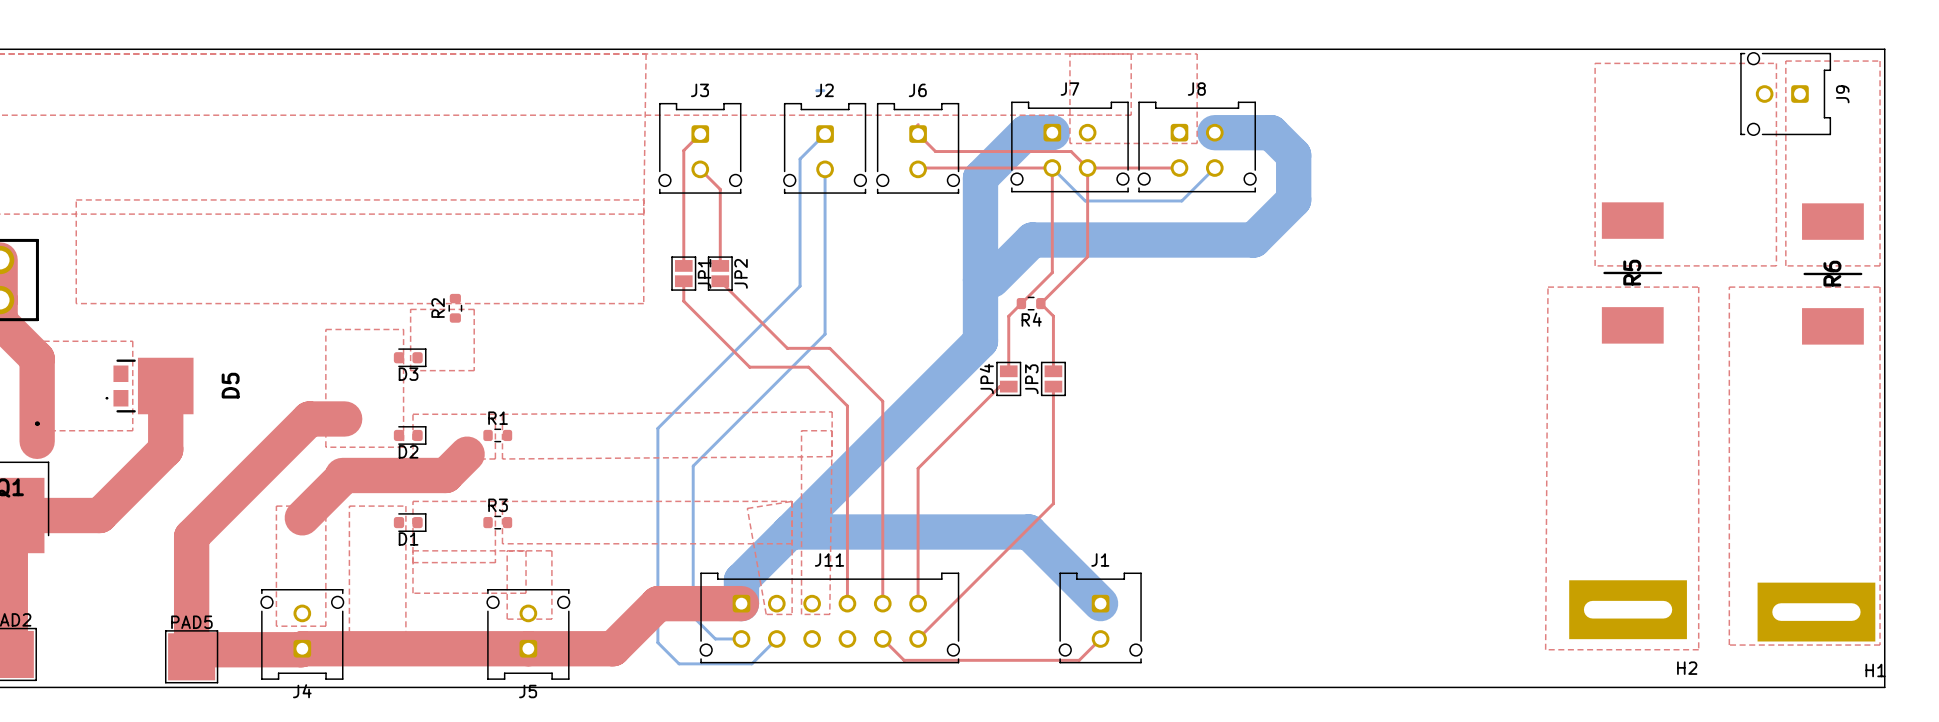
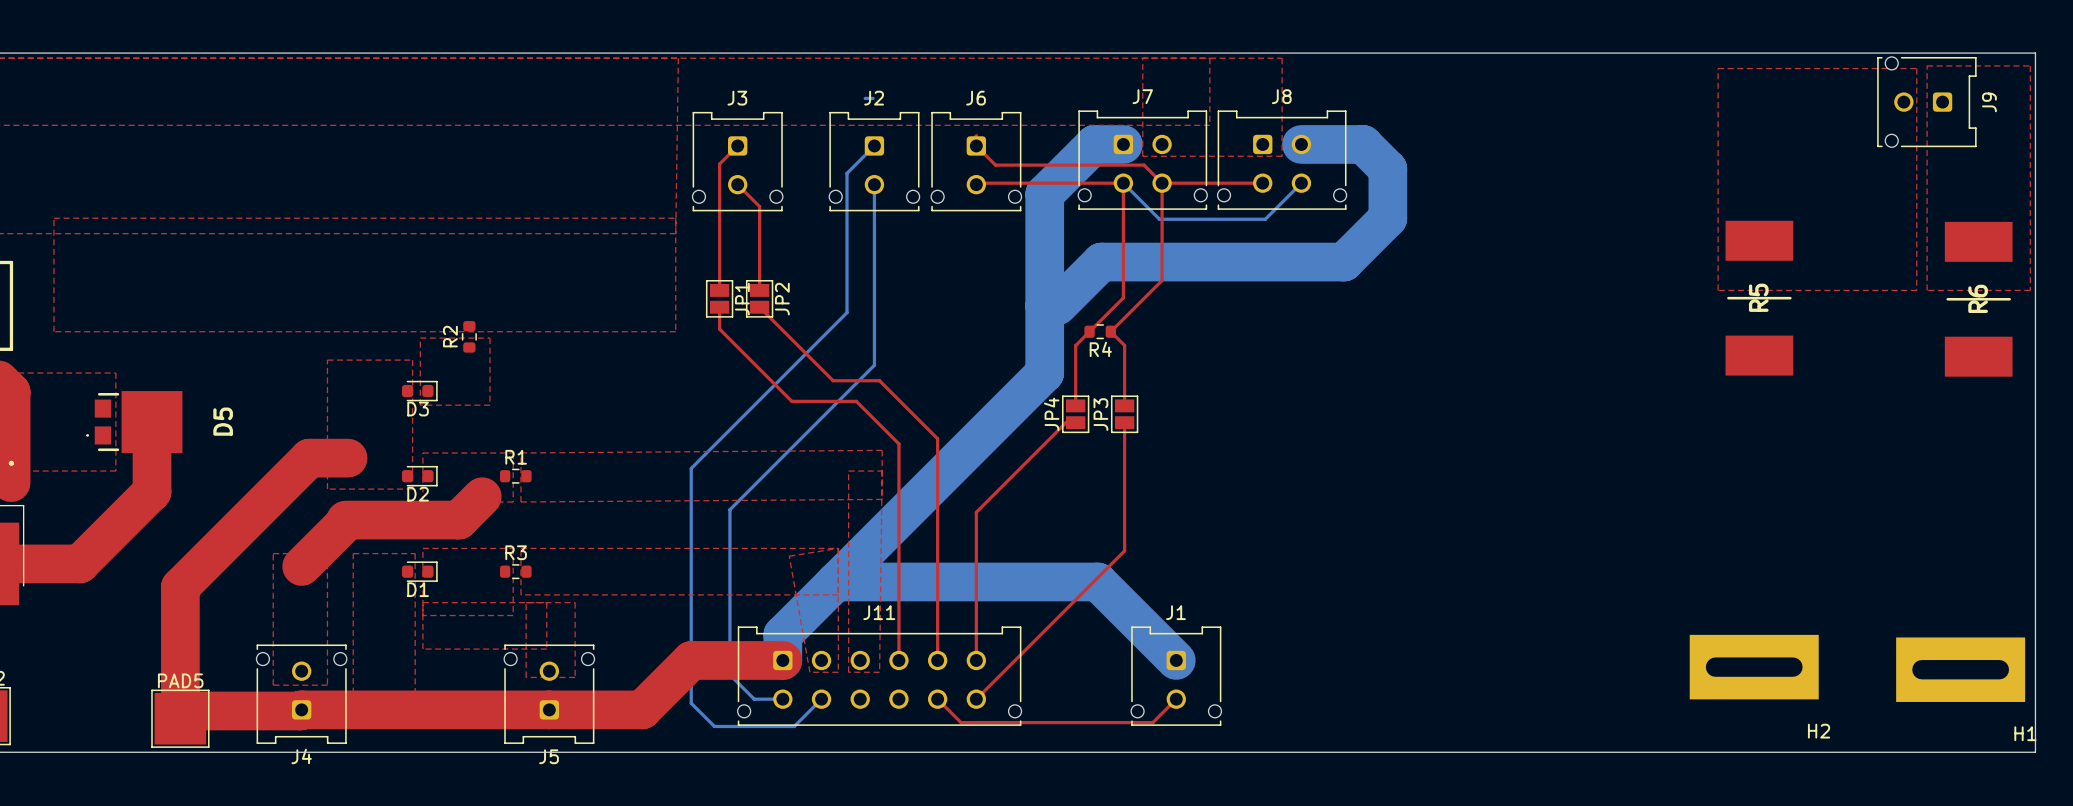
top zone outline: (1548, 287) (1698, 287) (1698, 649) (1545, 649) (1548, 287) -> none
top zone outline: (1729, 287) (1729, 645) (1880, 645) (1880, 287) (1729, 287) -> none

